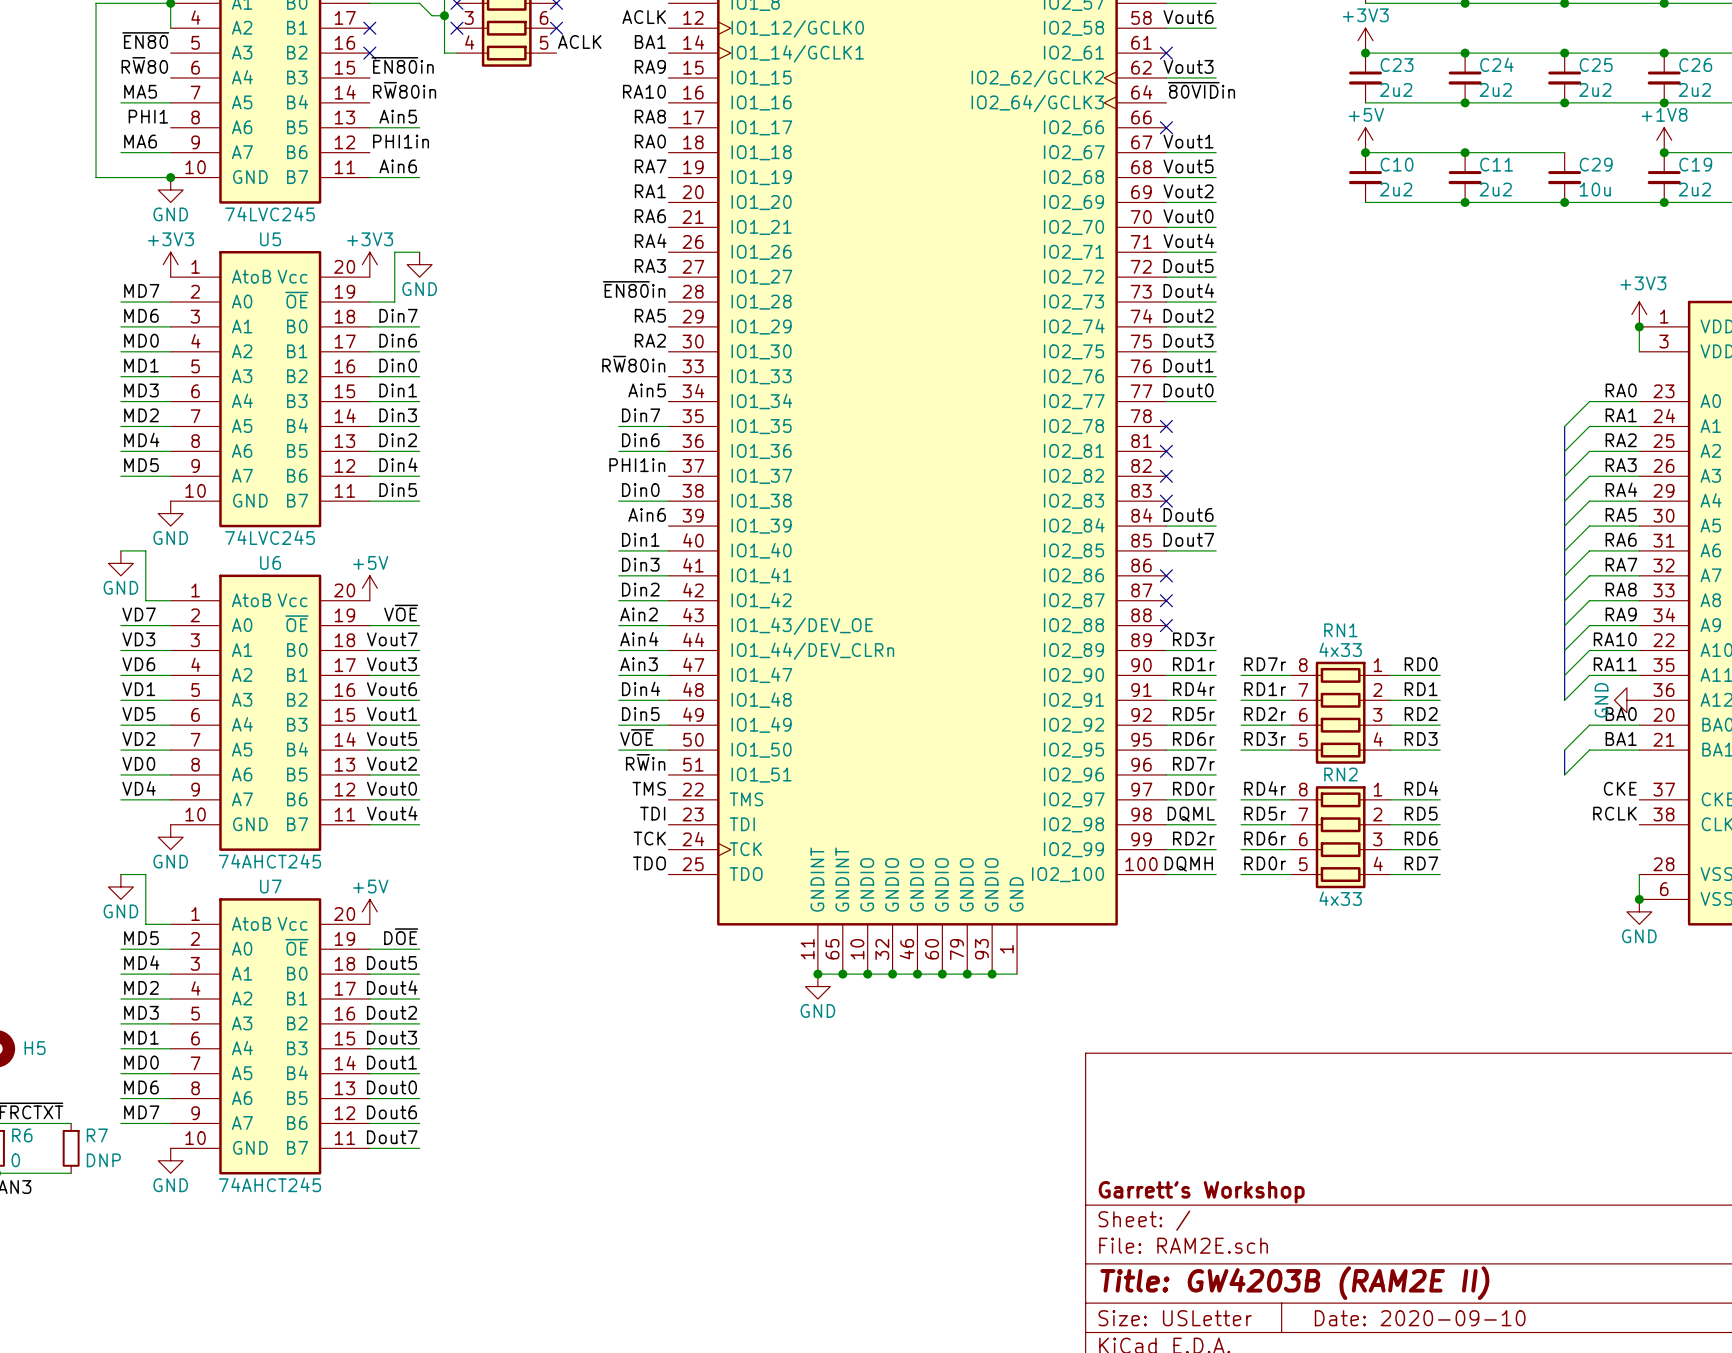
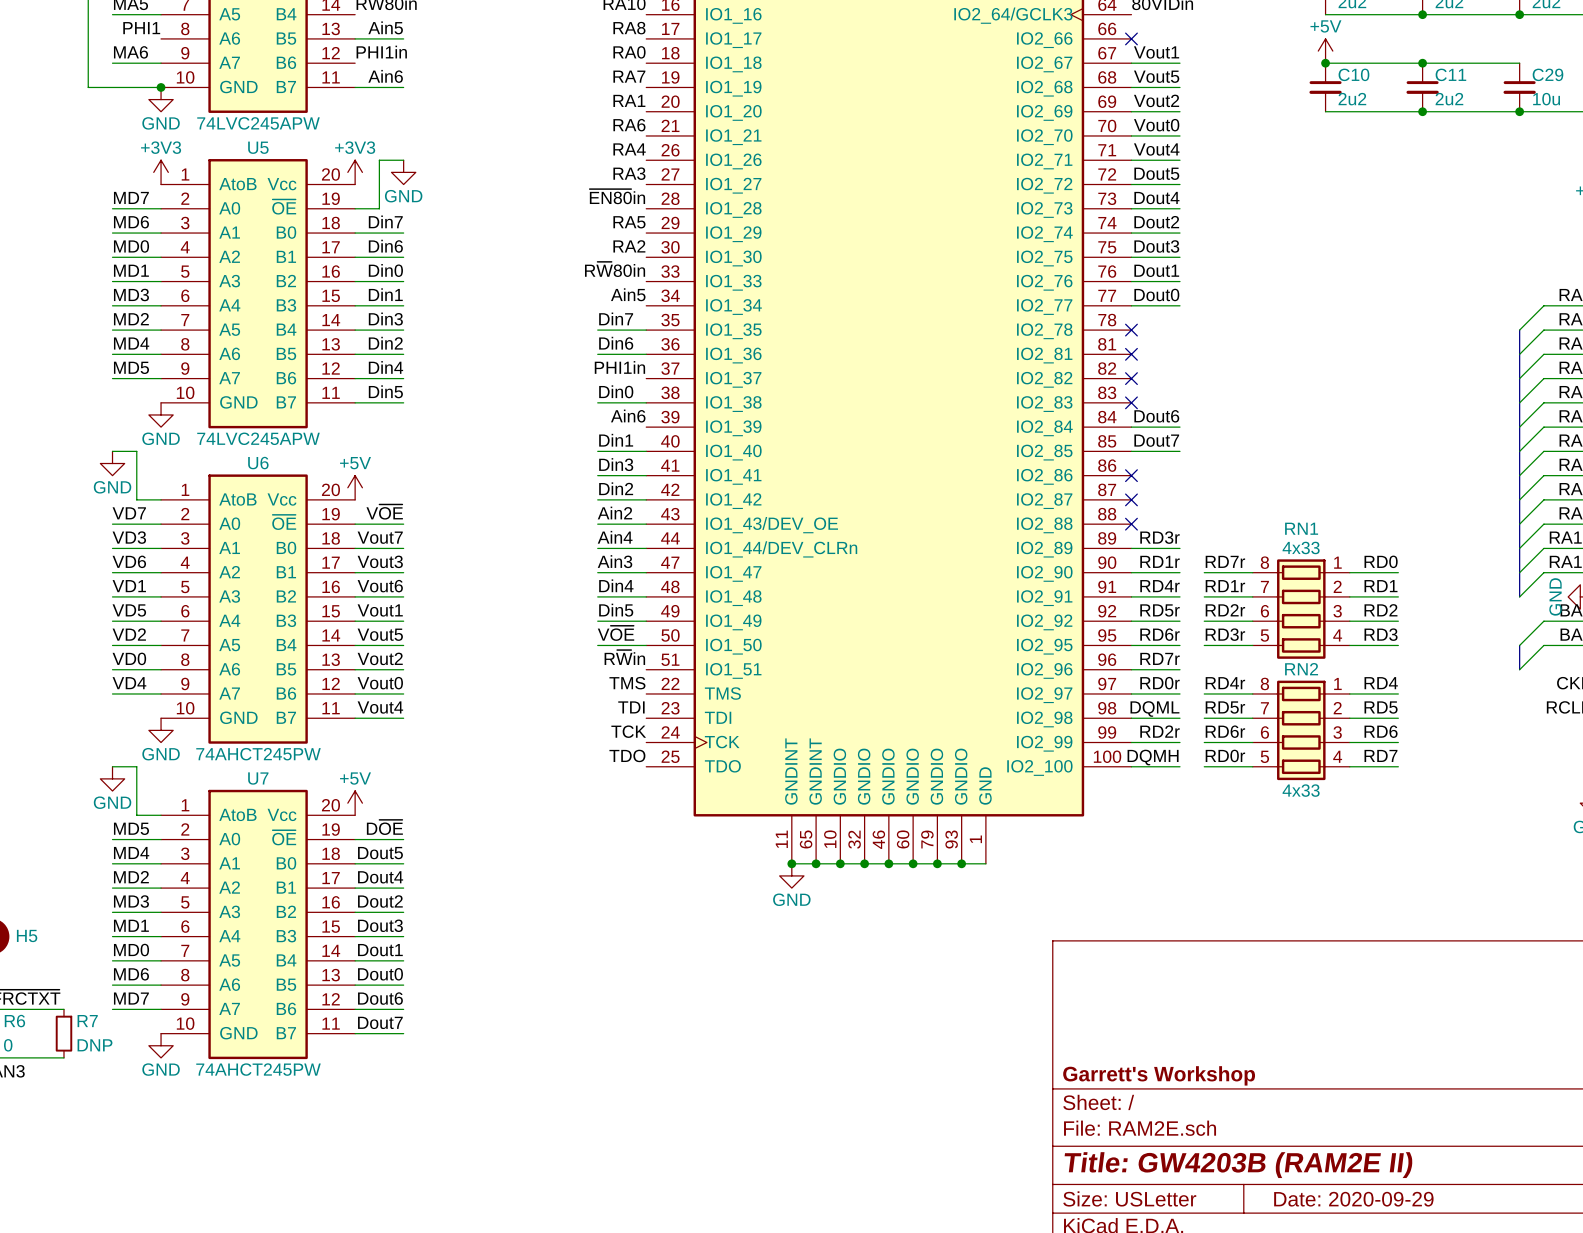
part value: 74LVC245 (269, 214) -> 74LVC245APW (258, 123)
U5 value: 74LVC245 (269, 537) -> 74LVC245APW (258, 438)
U6 value: 74AHCT245 (269, 861) -> 74AHCT245PW (258, 754)
U7 value: 74AHCT245 (269, 1184) -> 74AHCT245PW (258, 1069)
title block: Date: 2020-09-10 (1420, 1318) -> Date: 2020-09-29 (1353, 1199)

